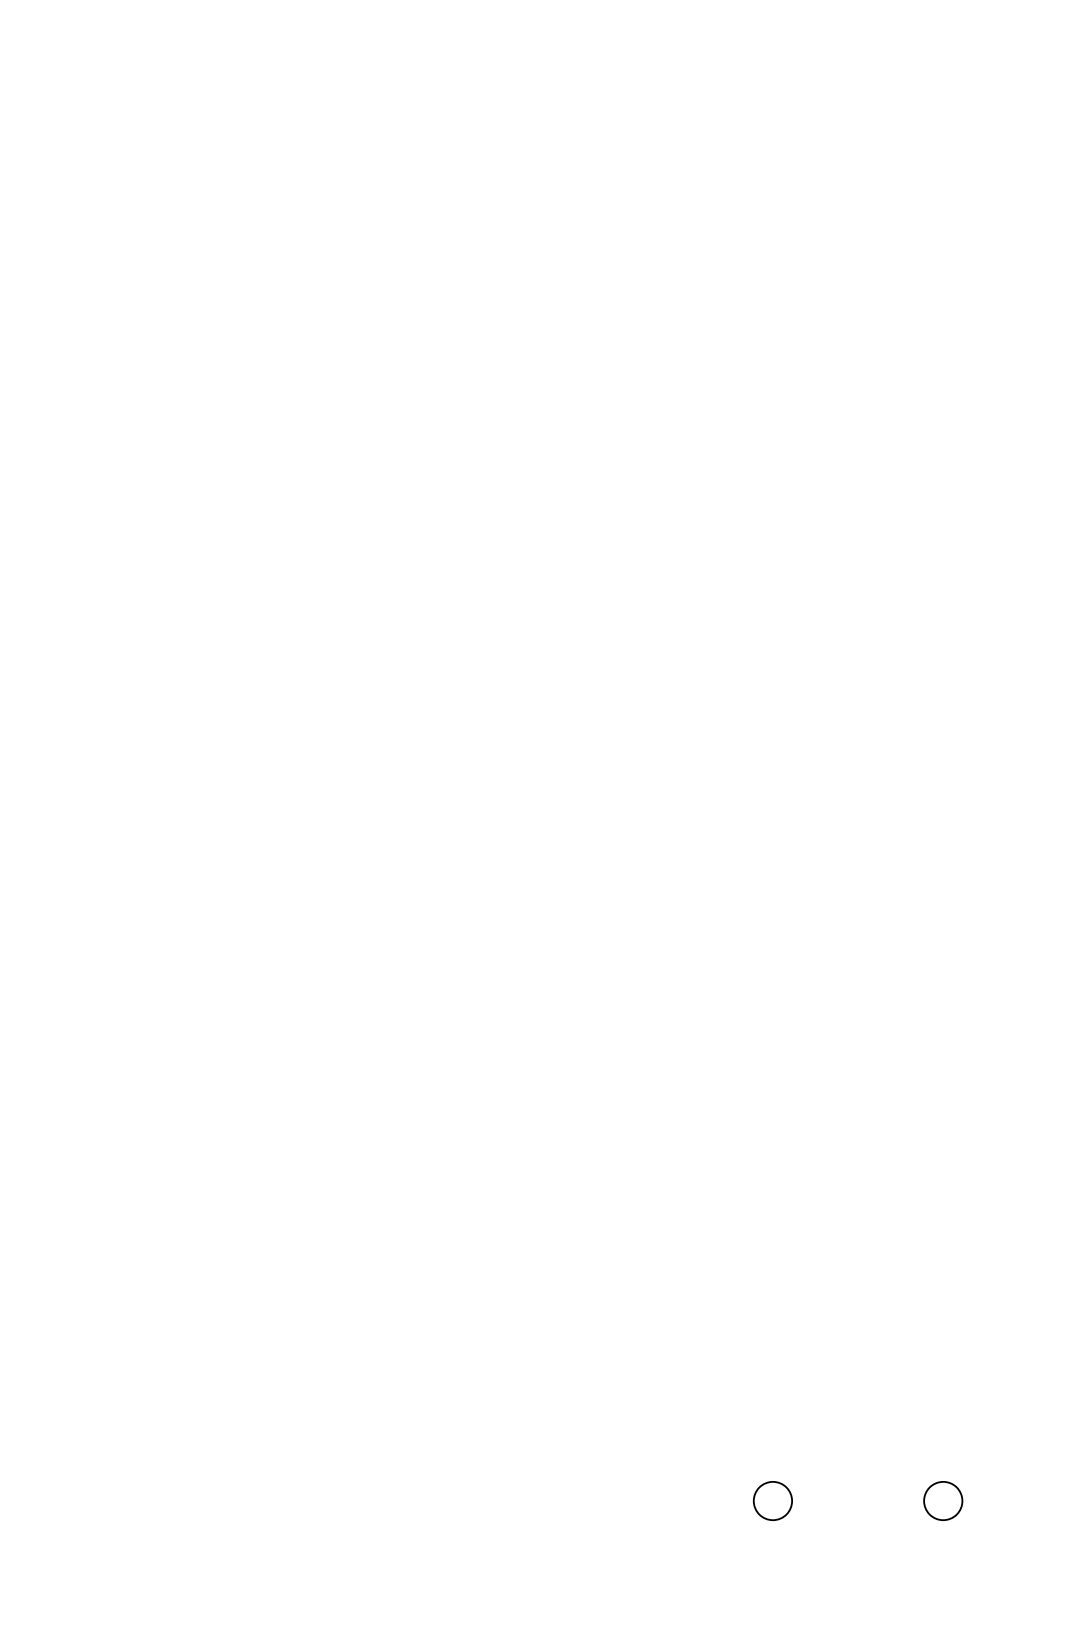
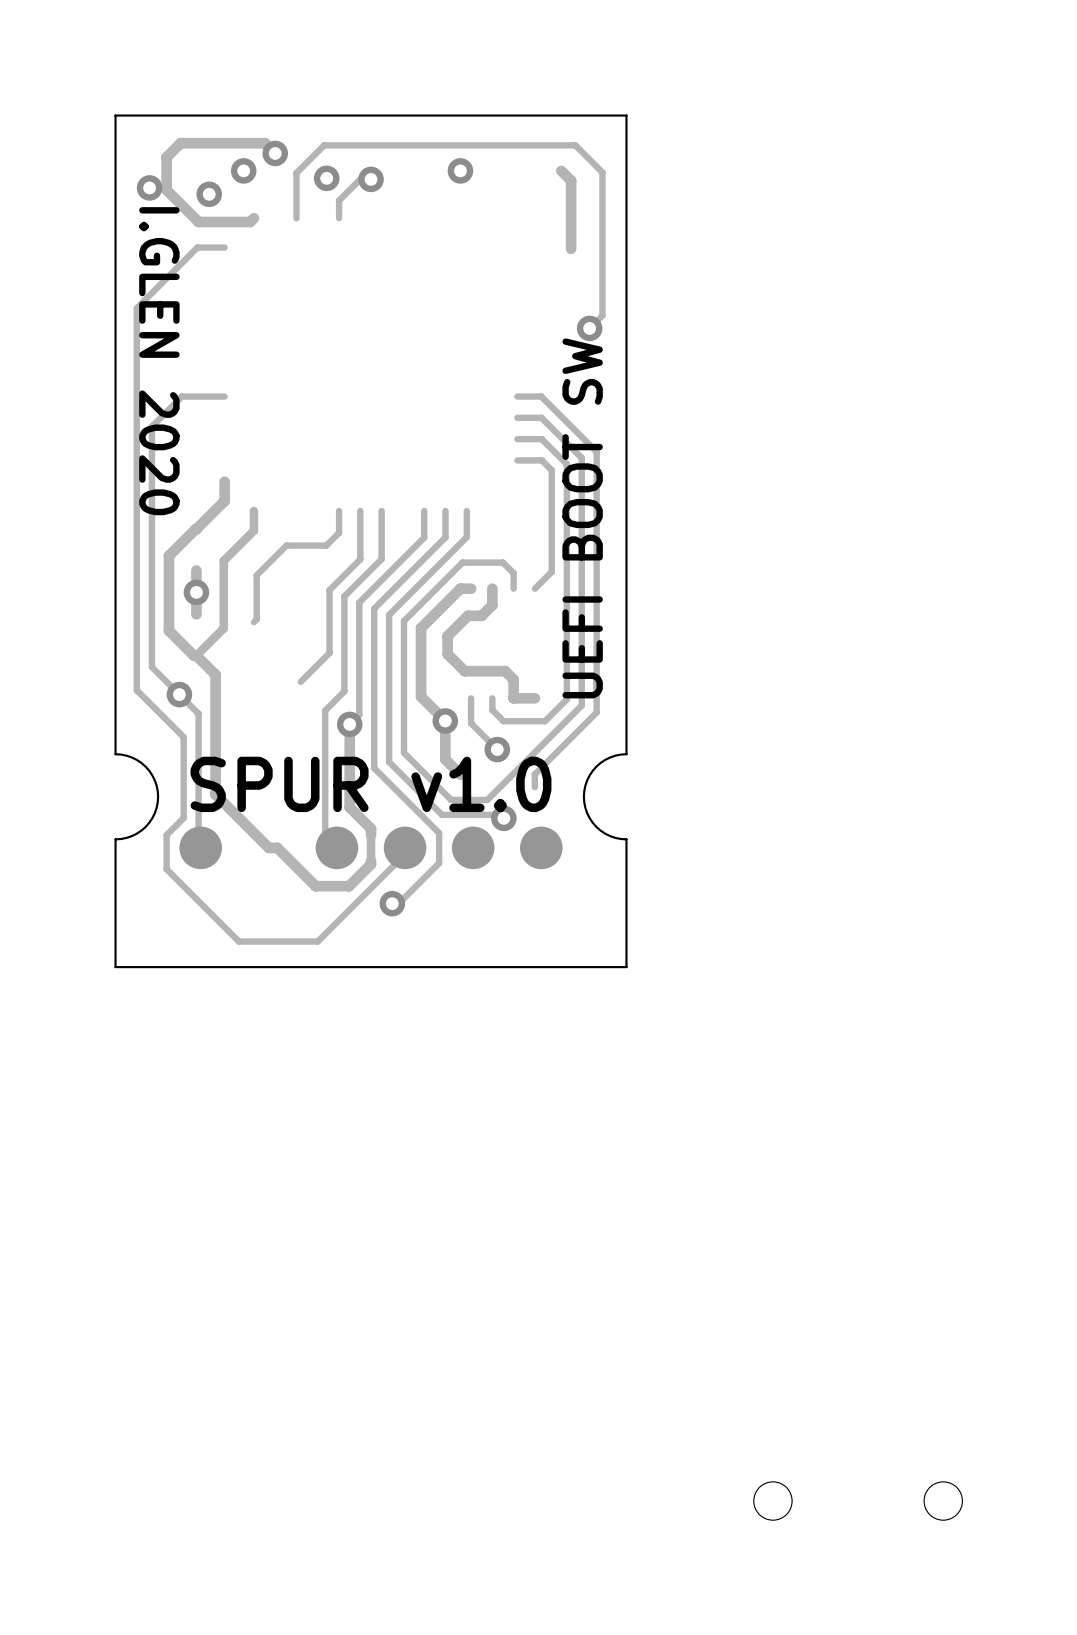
board edge: none -> (626, 115) (115, 115) (115, 754) (131, 757) (145, 766) (154, 780) (158, 796) (154, 813) (145, 826) (131, 836) (115, 839) (115, 967) (626, 967) (626, 839) (610, 836) (596, 826) (587, 813) (583, 796) (587, 780) (596, 766) (610, 757) (626, 754) (626, 115)
track: none -> (275, 153) (264, 143) (180, 143) (166, 157) (166, 190) (198, 221) (250, 221) (253, 218)
via: none -> (275, 153)
via: none -> (243, 170)
via: none -> (460, 170)
track: none -> (561, 170) (571, 180) (571, 248)
via: none -> (326, 178)
track: none -> (371, 179) (360, 179) (339, 200) (339, 218)
via: none -> (371, 179)
via: none -> (149, 187)
via: none -> (209, 194)
track: none -> (296, 218) (296, 173) (324, 145) (575, 145) (602, 172) (602, 315) (589, 328)
track: none -> (224, 247) (197, 247) (136, 308) (136, 690) (183, 737) (183, 818) (166, 835) (166, 869) (239, 941) (317, 941) (405, 854) (405, 847)
via: none -> (589, 328)
text: none -> I.GLEN 2020 (159, 361)
track: none -> (224, 396) (181, 396) (151, 426) (151, 667) (198, 713) (198, 845) (200, 847)
track: none -> (517, 396) (541, 396) (596, 451) (596, 712) (534, 774) (534, 787)
track: none -> (517, 417) (541, 417) (581, 458) (581, 705) (487, 799) (451, 799) (404, 752) (404, 621) (462, 562) (503, 562) (513, 573) (513, 588)
track: none -> (517, 439) (541, 439) (566, 464) (566, 699) (545, 721) (503, 721) (492, 710) (492, 698)
track: none -> (517, 460) (541, 460) (551, 470) (551, 571) (534, 588)
track: none -> (224, 481) (224, 500) (196, 529)
track: none -> (253, 510) (253, 530) (223, 560) (223, 628) (196, 655)
track: none -> (339, 510) (339, 532) (326, 545) (286, 545) (256, 575) (256, 619) (253, 622)
track: none -> (360, 510) (360, 559) (329, 590) (329, 653) (300, 681)
track: none -> (381, 510) (381, 559) (344, 596) (344, 691) (325, 710) (325, 836) (336, 847)
track: none -> (424, 510) (424, 537) (359, 602) (359, 714) (349, 724) (349, 807) (371, 828) (371, 864) (349, 886) (315, 886) (277, 847) (268, 847)
track: none -> (445, 510) (445, 537) (374, 608) (374, 768) (439, 833) (439, 863) (398, 903) (392, 903)
track: none -> (466, 510) (466, 537) (389, 614) (389, 762) (441, 814) (500, 814) (503, 818)
text: none -> UEFI BOOT SW (582, 518)
track: none -> (195, 529) (168, 555) (168, 630) (193, 655) (196, 655)
track: none -> (196, 570) (196, 614)
track: none -> (471, 588) (460, 588) (421, 628) (421, 696) (445, 720) (445, 759) (460, 774)
track: none -> (492, 588) (492, 605) (481, 615) (467, 615) (447, 636) (447, 654) (464, 671) (505, 671) (513, 679) (513, 698) (534, 698)
via: none -> (196, 592)
track: none -> (196, 655) (215, 674) (215, 794) (268, 847)
via: none -> (179, 694)
track: none -> (471, 698) (471, 723) (497, 749)
via: none -> (445, 720)
via: none -> (349, 724)
via: none -> (497, 749)
text: none -> SPUR v1.0 (371, 784)
via: none -> (503, 818)
part: none -> (200, 847)
part: none -> (336, 847)
part: none -> (405, 847)
part: none -> (473, 847)
part: none -> (541, 847)
via: none -> (392, 903)

